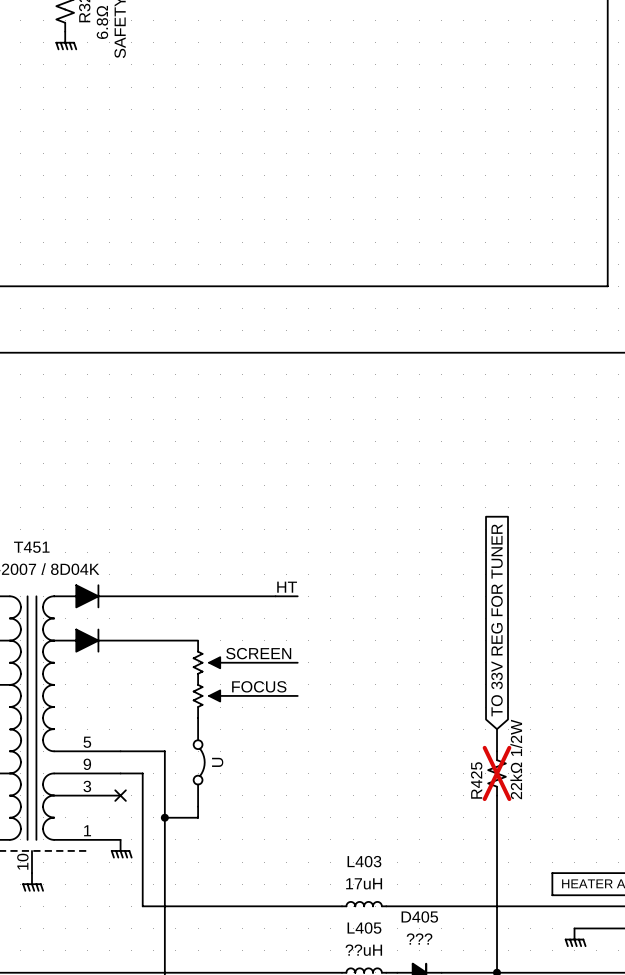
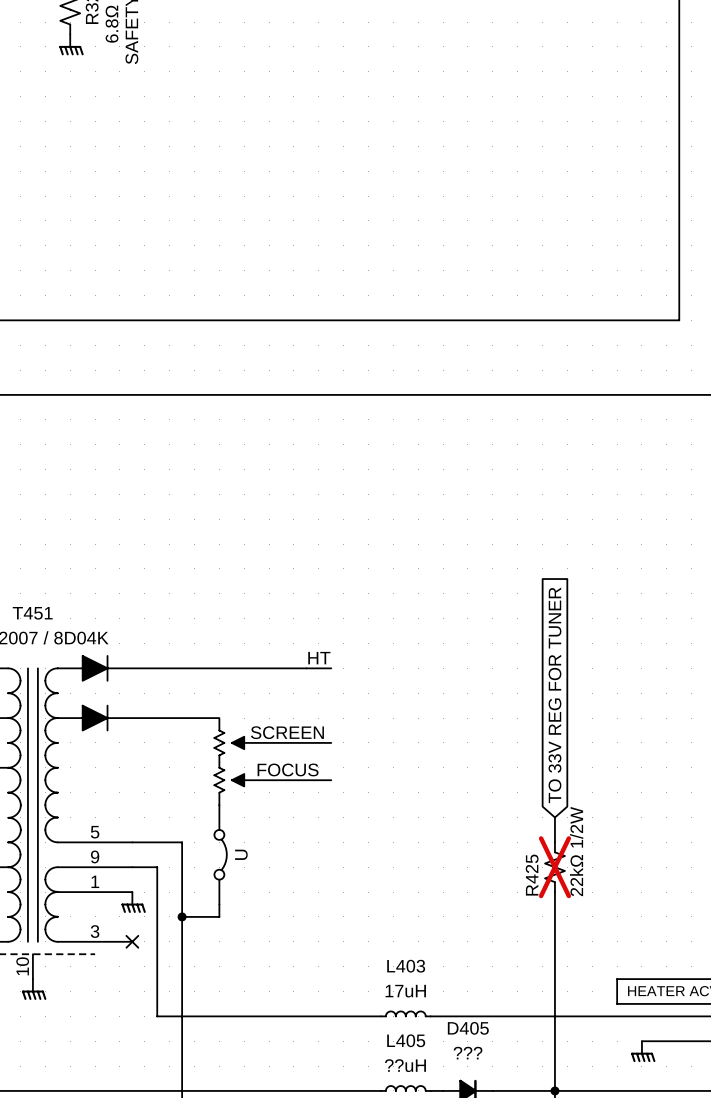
T451 pin number: 3 (87, 786) -> 1 (95, 881)
no-connect mark position: (120, 795) -> (132, 941)
T451 pin number: 1 (87, 830) -> 3 (95, 931)
power symbol position: (121, 849) -> (133, 902)

